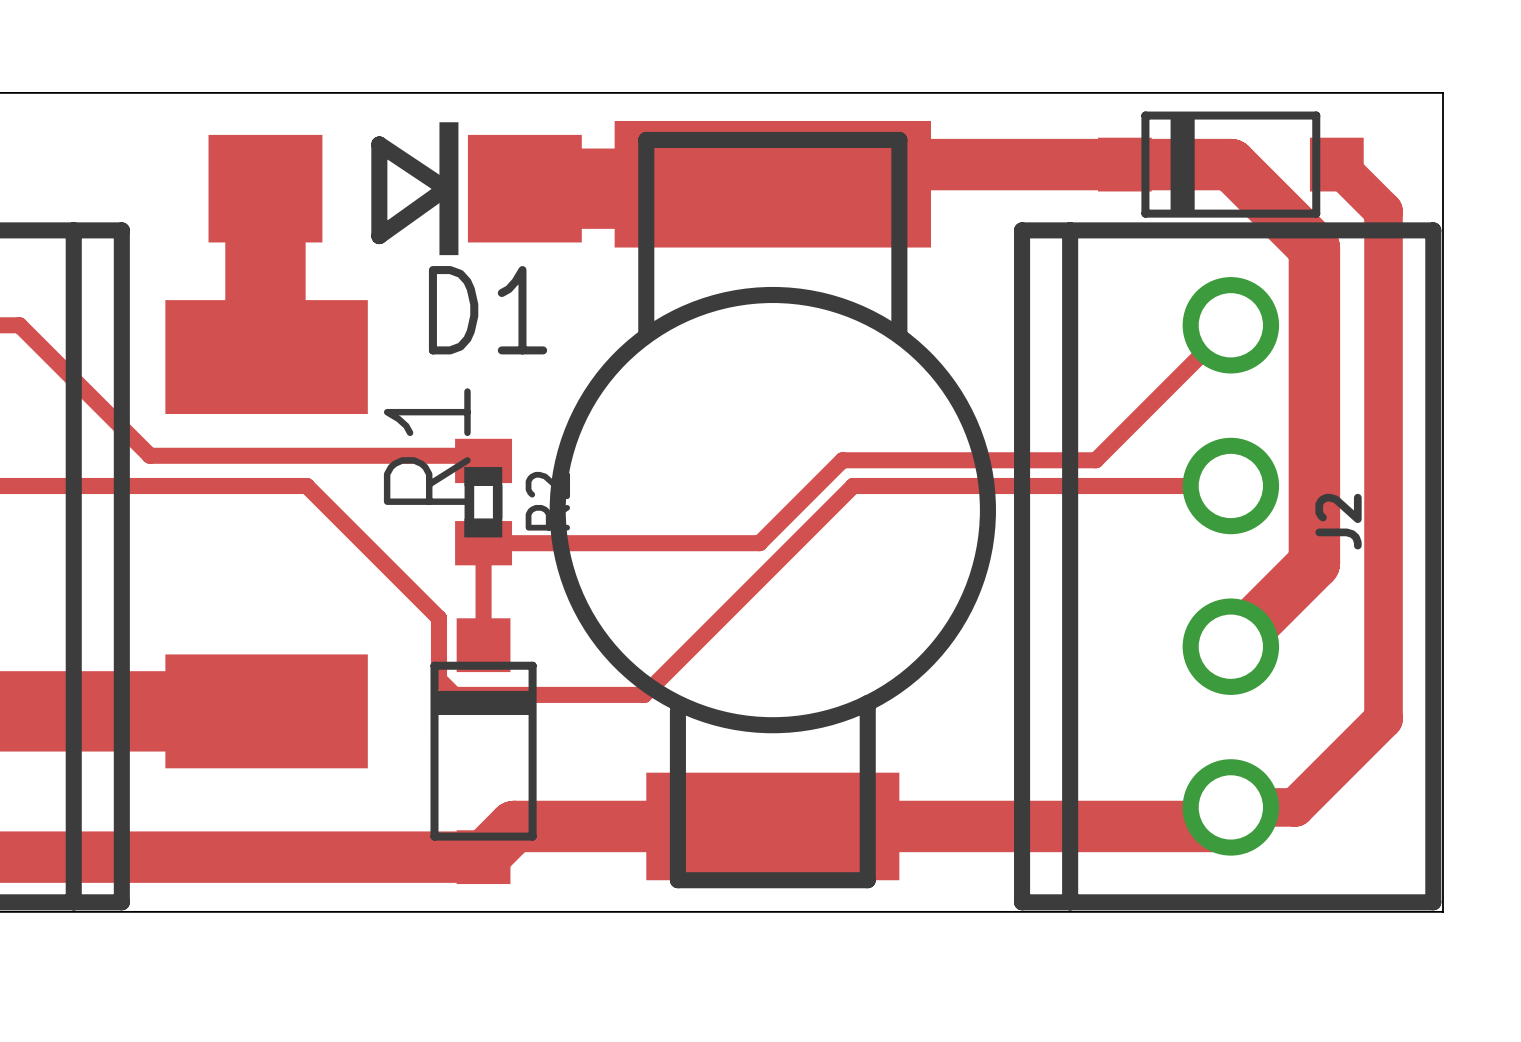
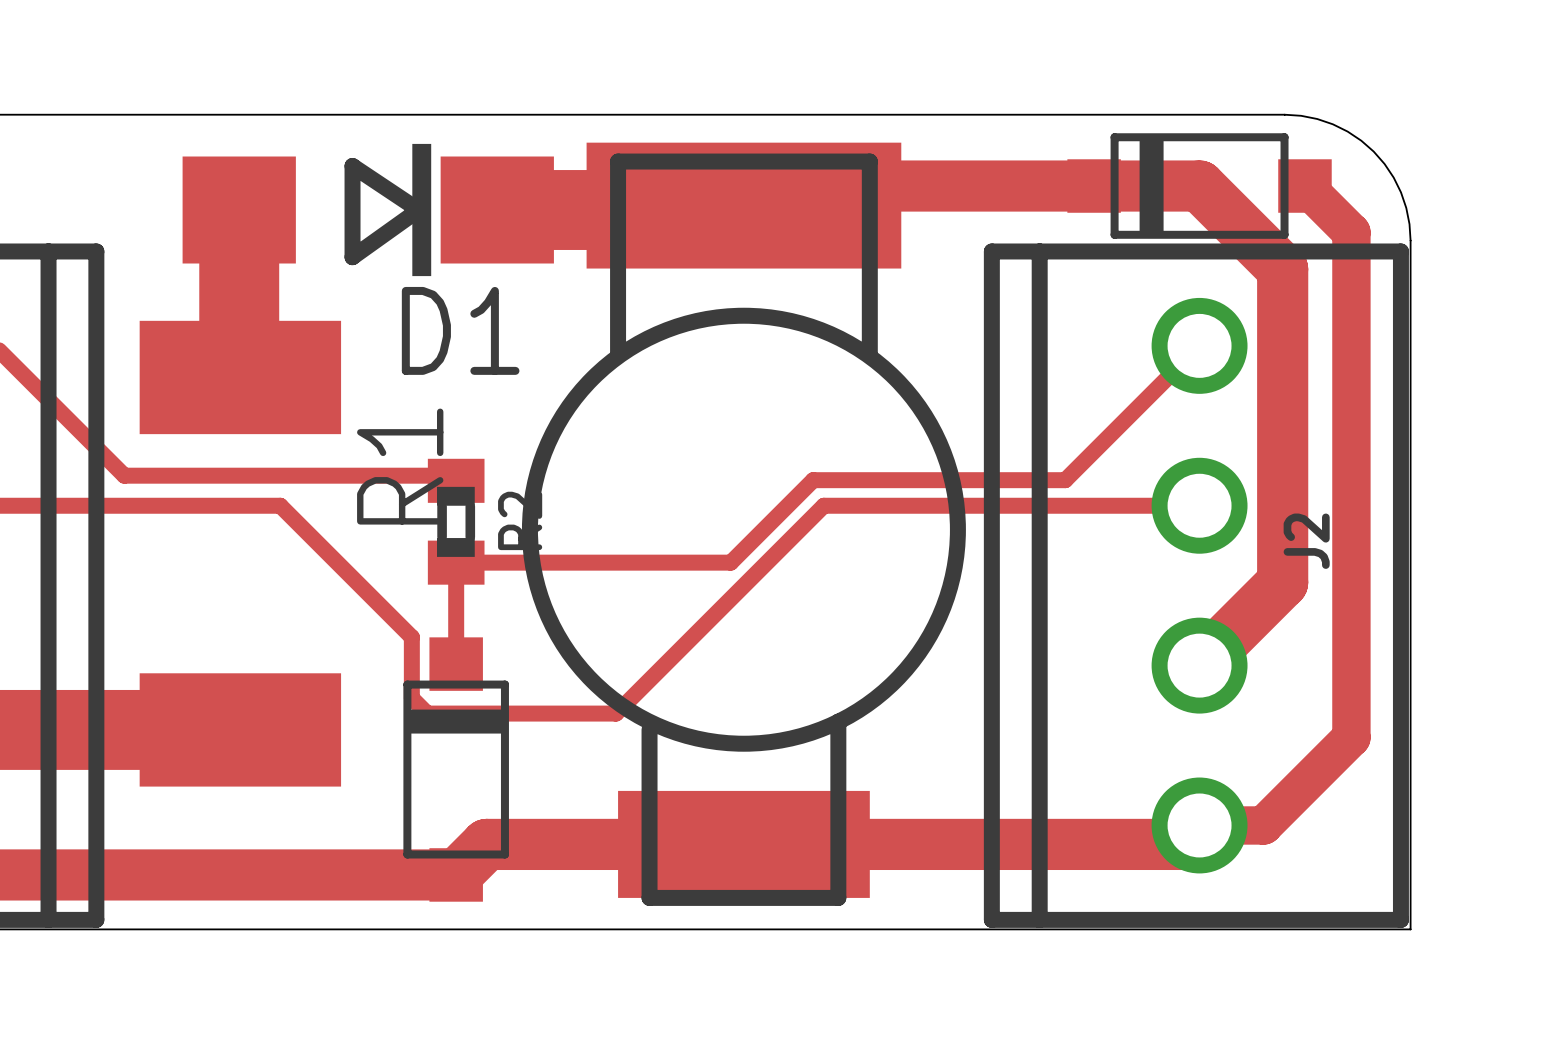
board edge: (1316, 92) (1442, 92) (1442, 219) -> (1284, 114) (1317, 119) (1332, 124) (1347, 131) (1373, 151) (1393, 177) (1401, 192) (1406, 208) (1410, 240)

